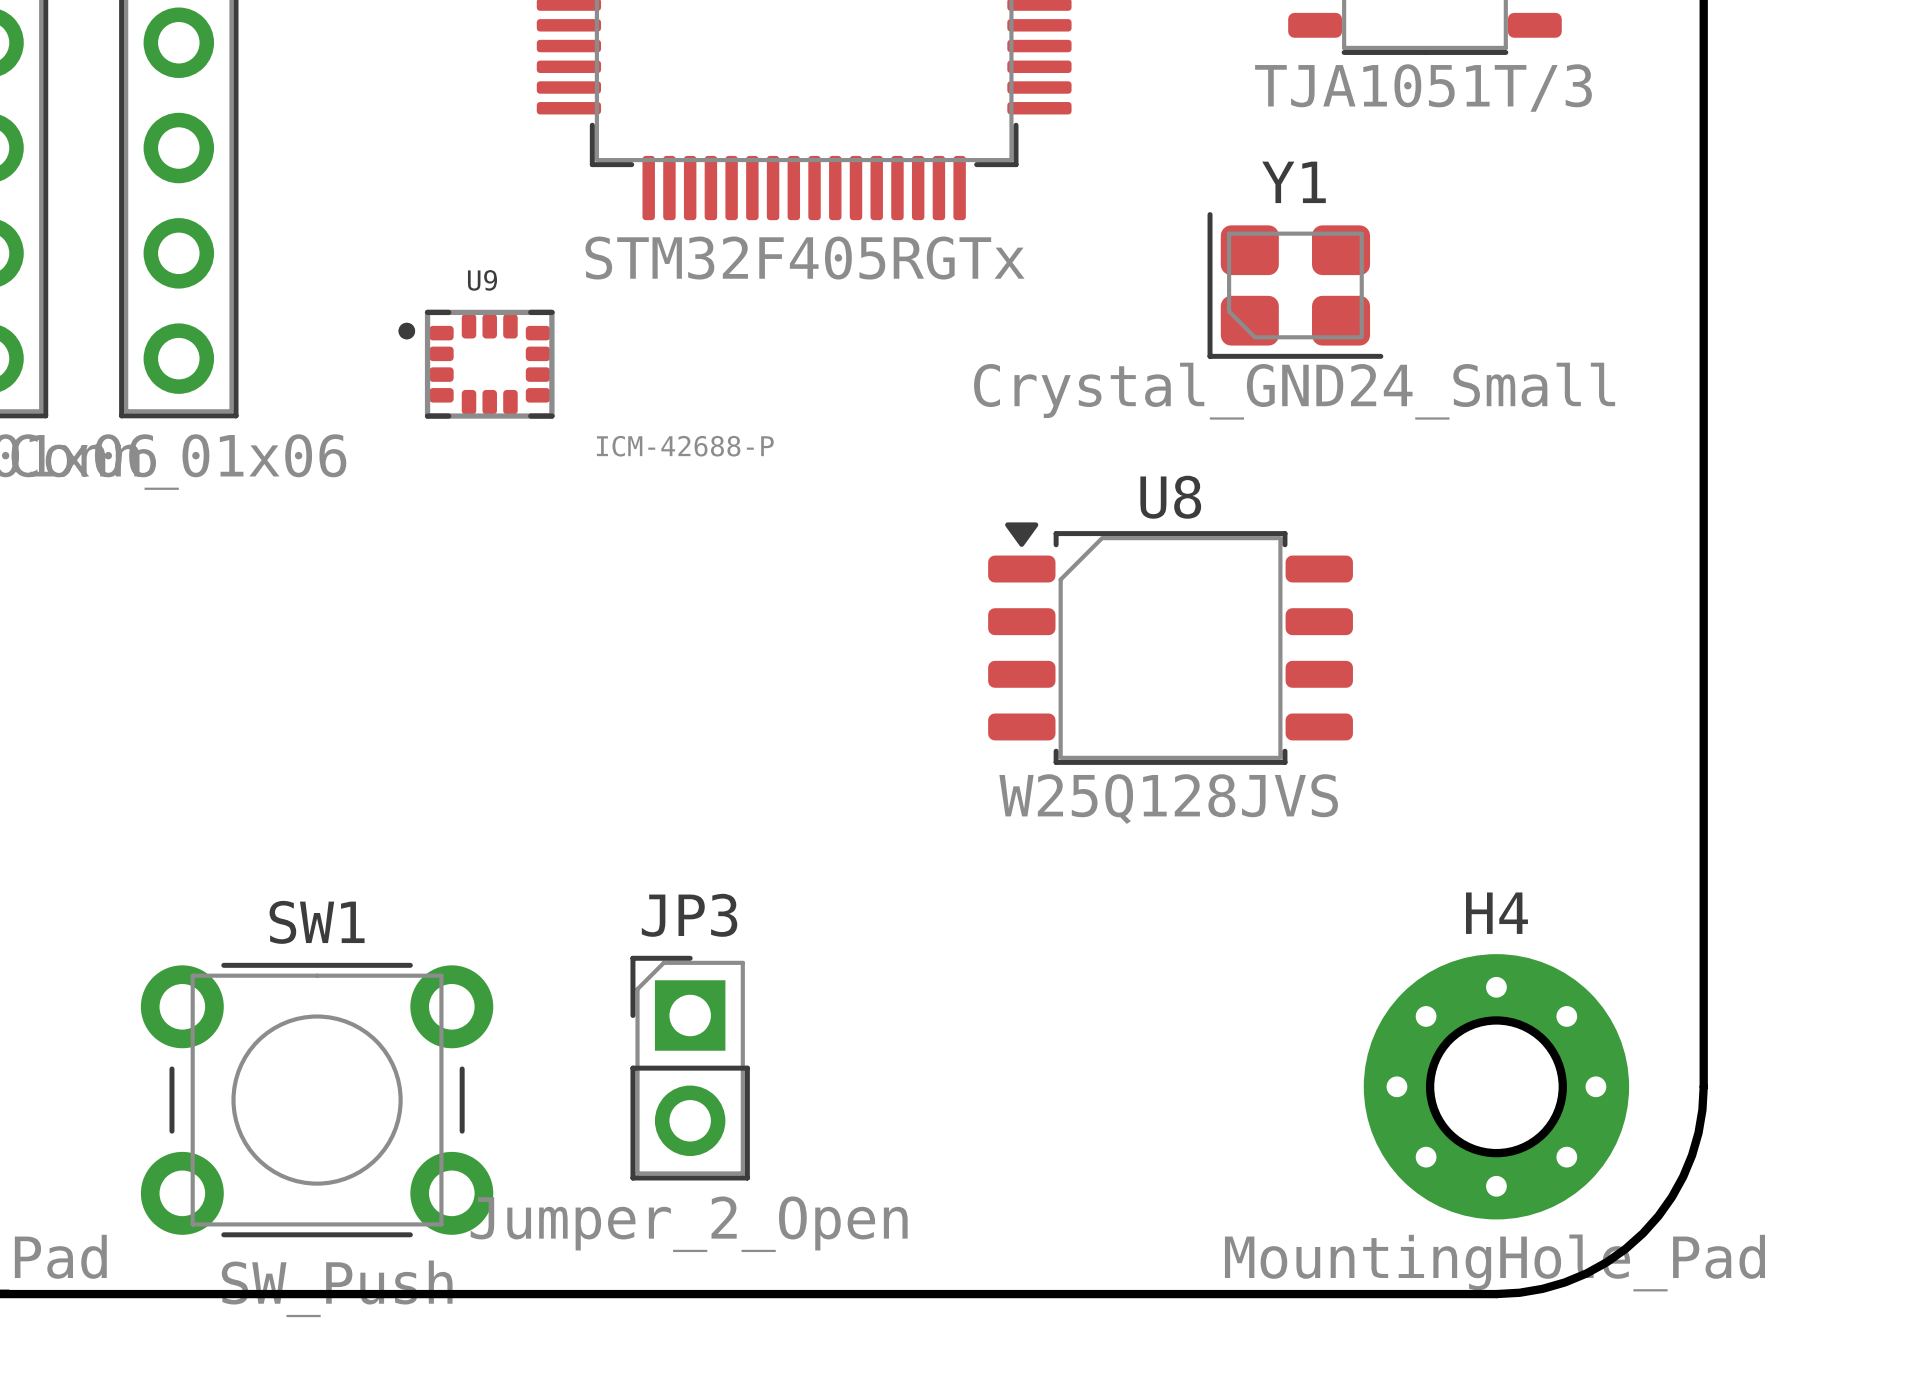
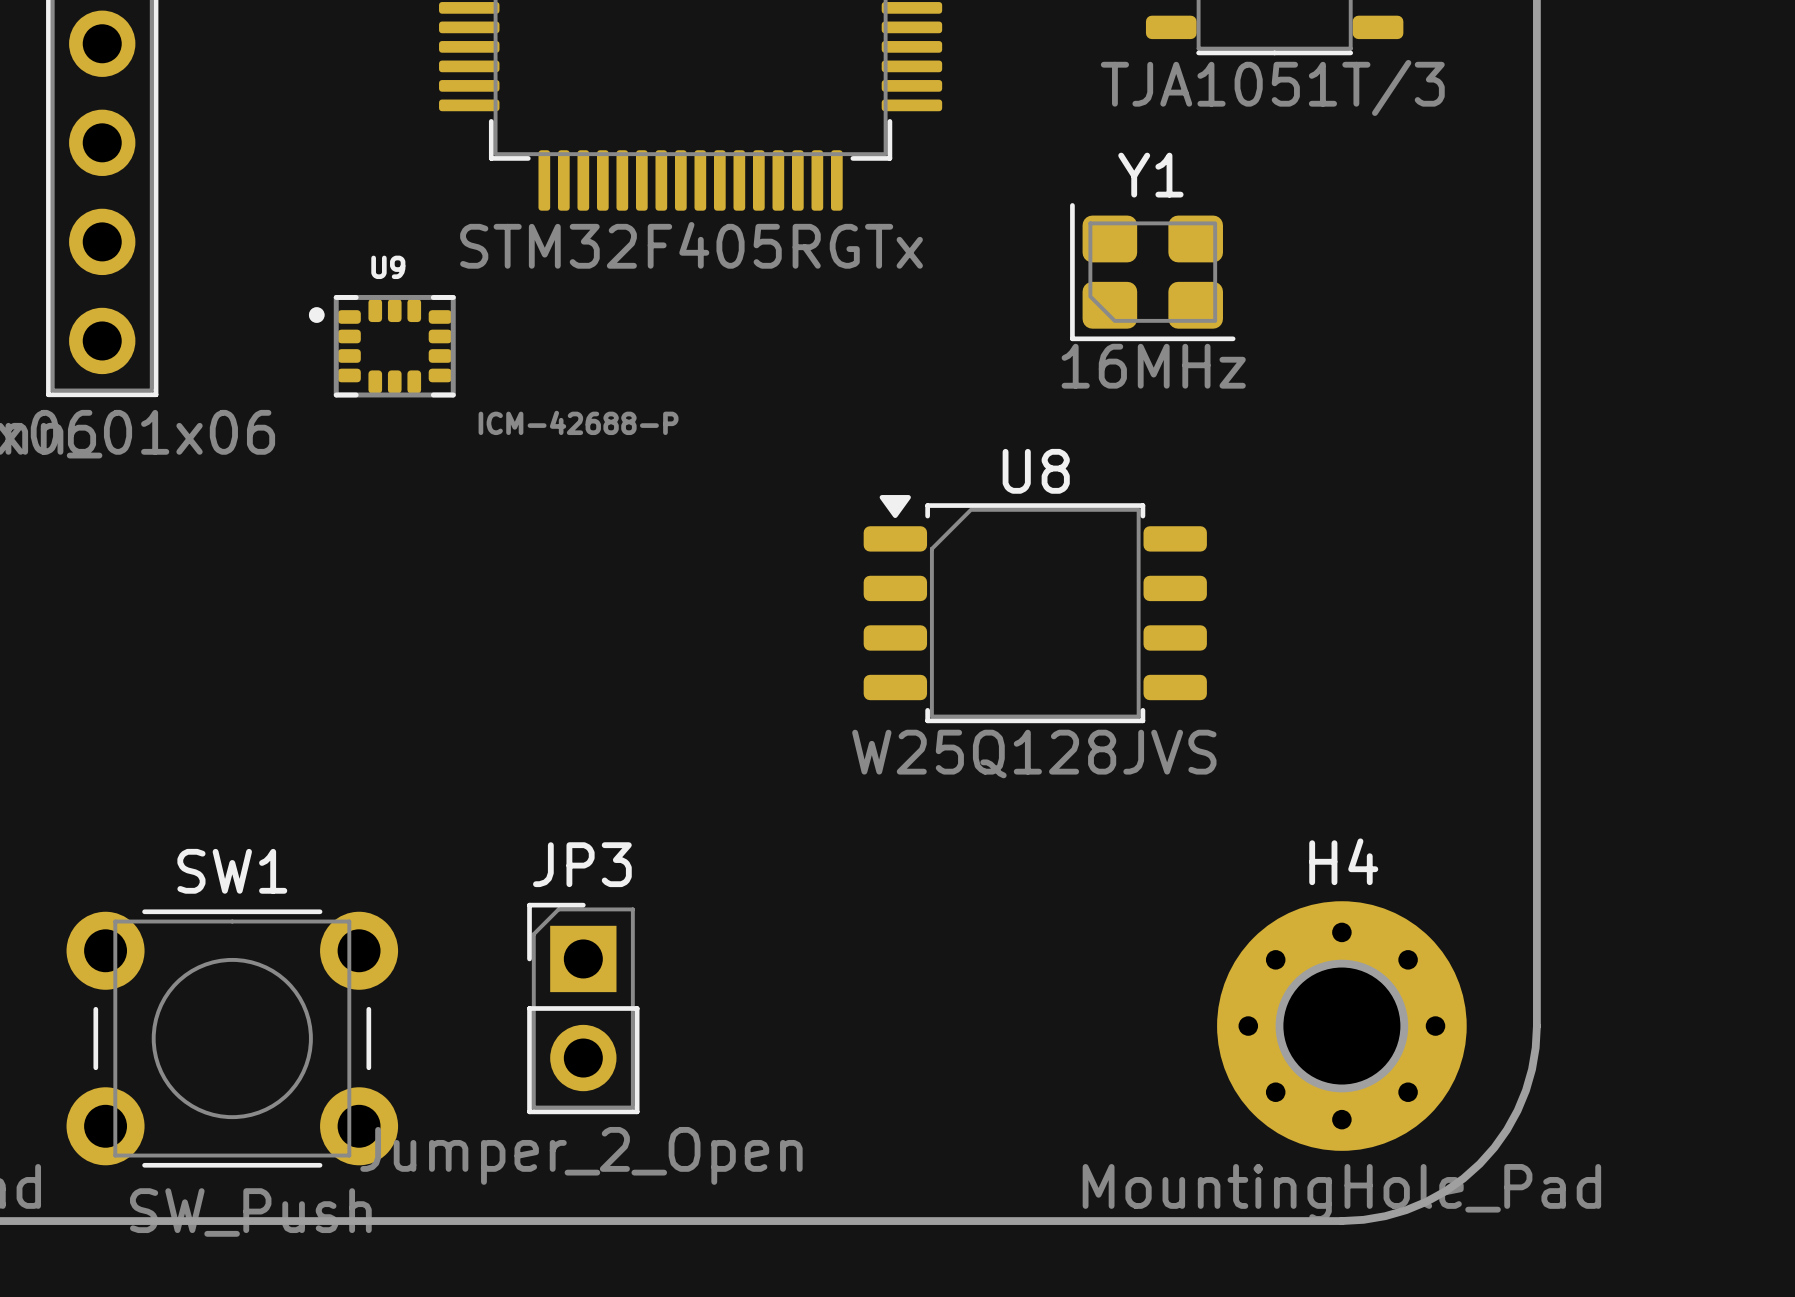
Y1 value: Crystal_GND24_Small (1294, 391) -> 16MHz (1153, 366)

